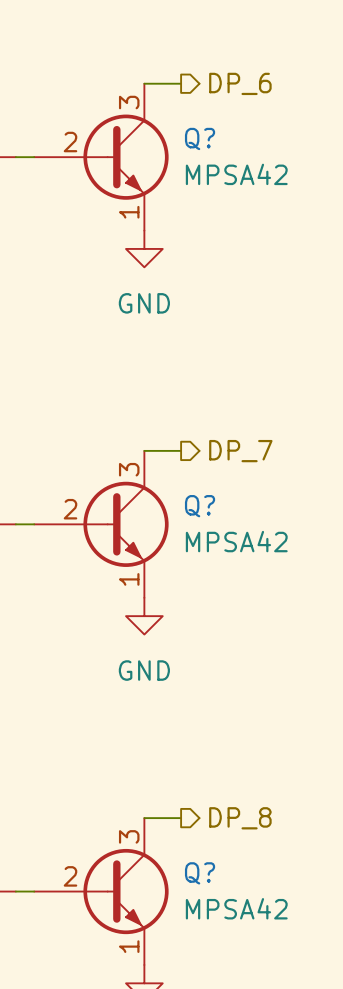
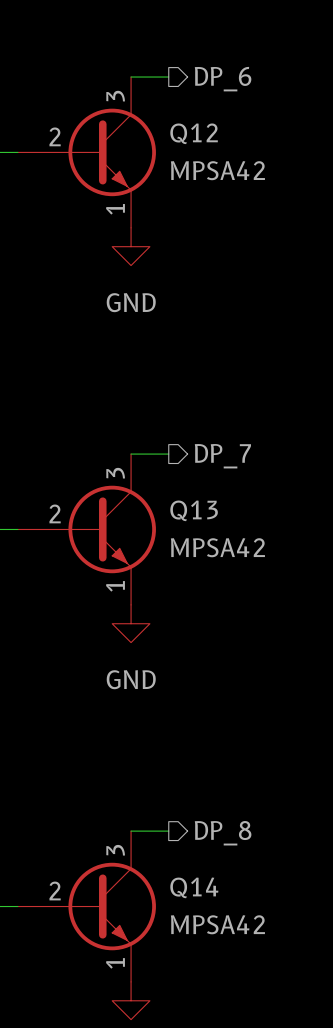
Q? name: Q? (200, 138) -> Q12 (194, 133)
Q? name: Q? (200, 506) -> Q13 (194, 510)
Q? name: Q? (200, 873) -> Q14 (194, 887)

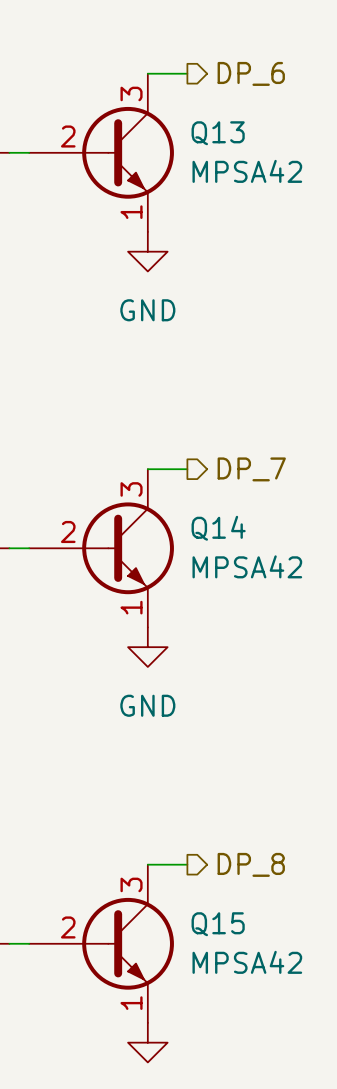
Q12 name: Q12 (194, 133) -> Q13 (218, 133)
Q13 name: Q13 (194, 510) -> Q14 (218, 528)
Q14 name: Q14 (194, 887) -> Q15 (218, 924)

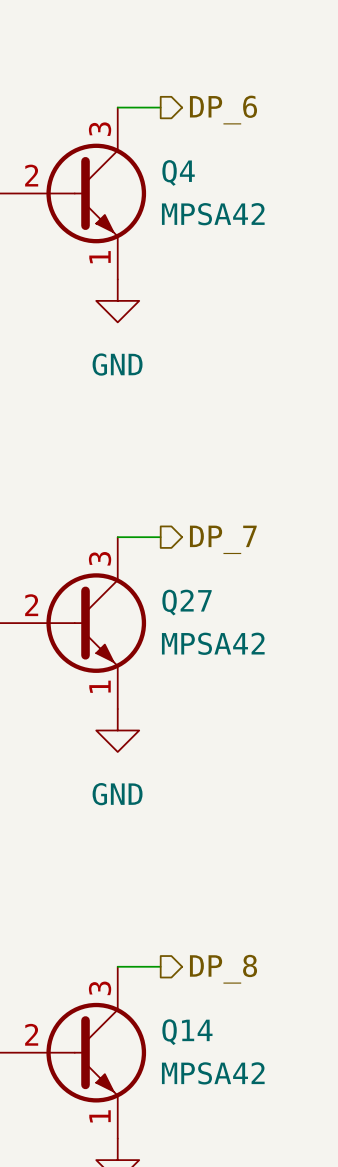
Q13 name: Q13 (218, 133) -> Q4 (178, 172)
Q14 name: Q14 (218, 528) -> Q27 (187, 602)
Q15 name: Q15 (218, 924) -> Q14 (187, 1032)

